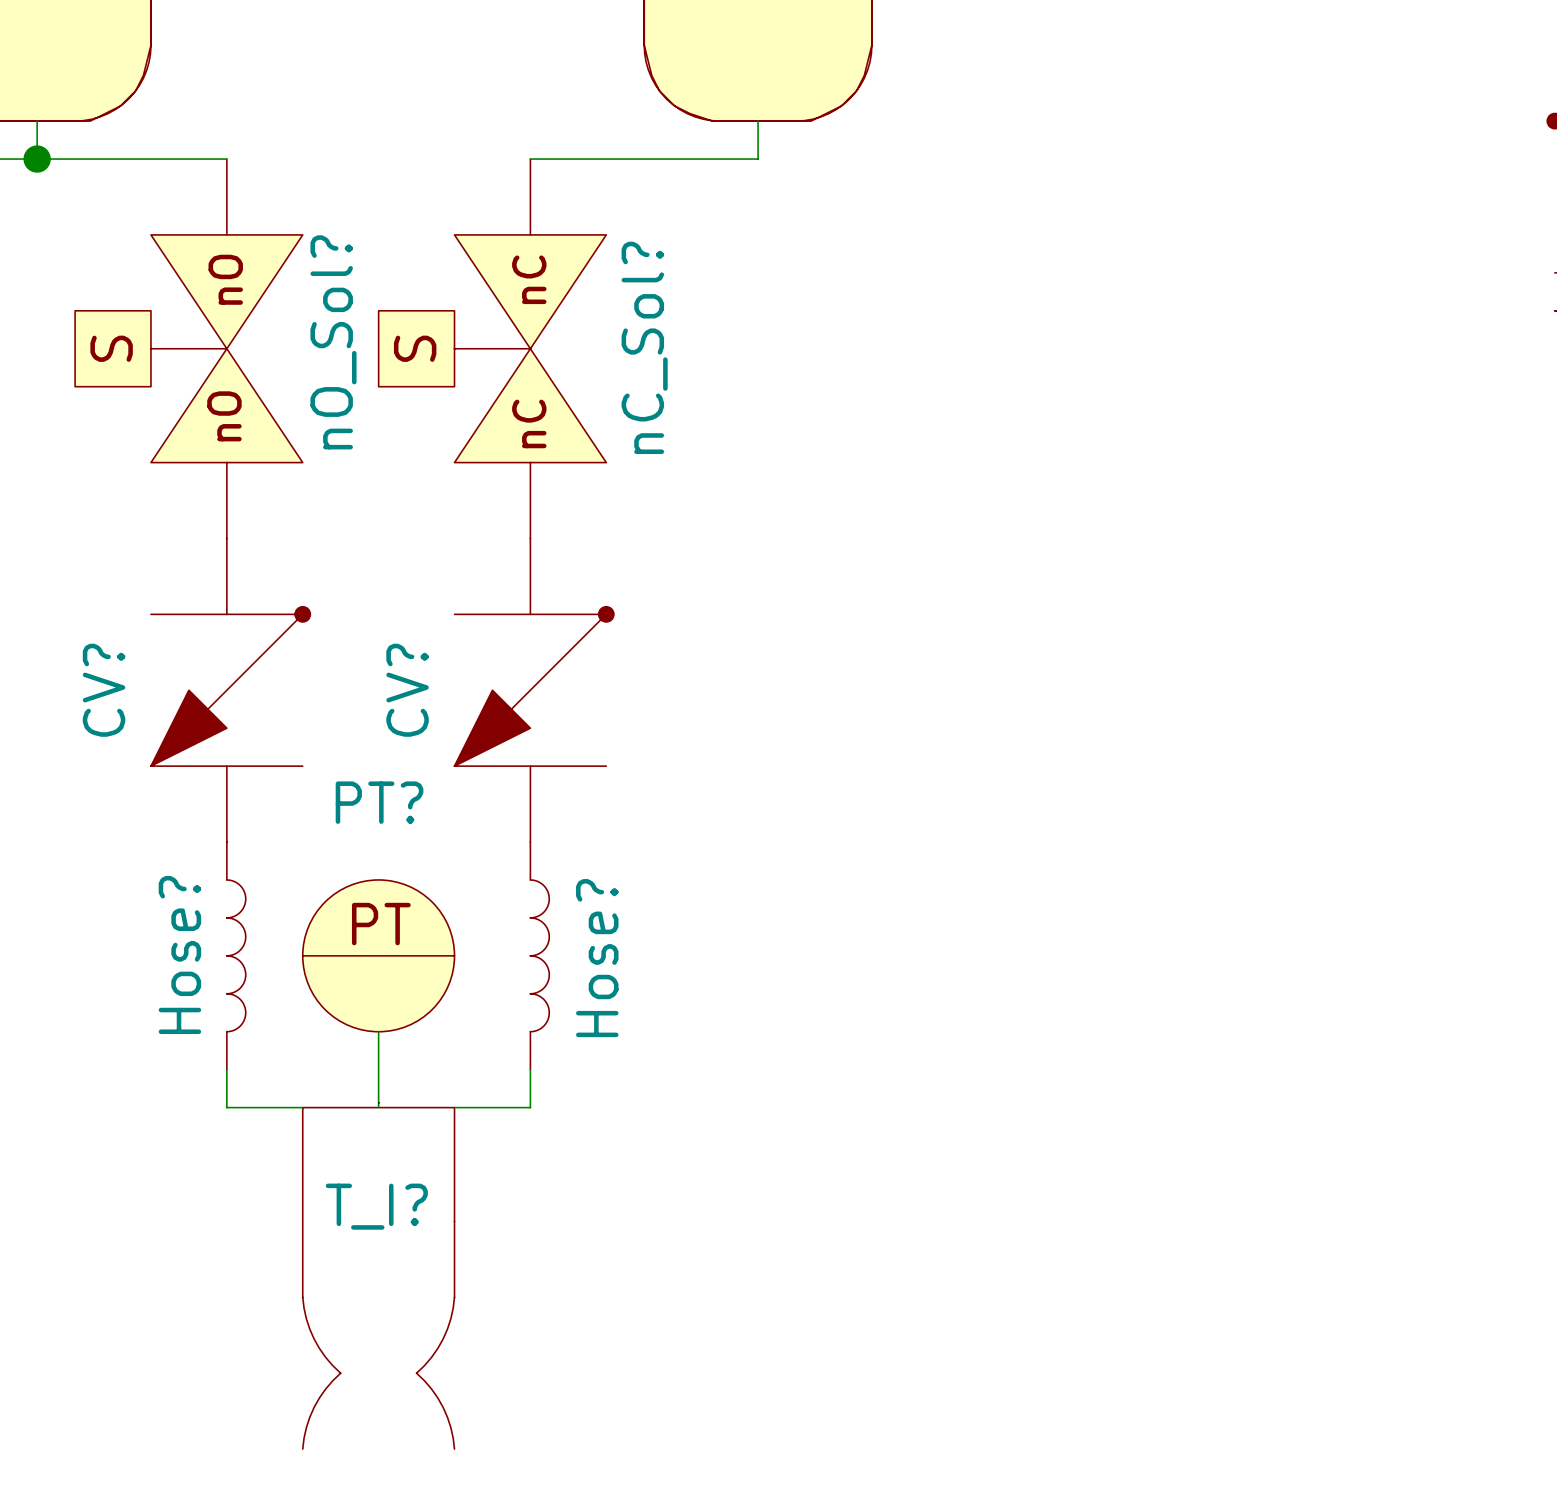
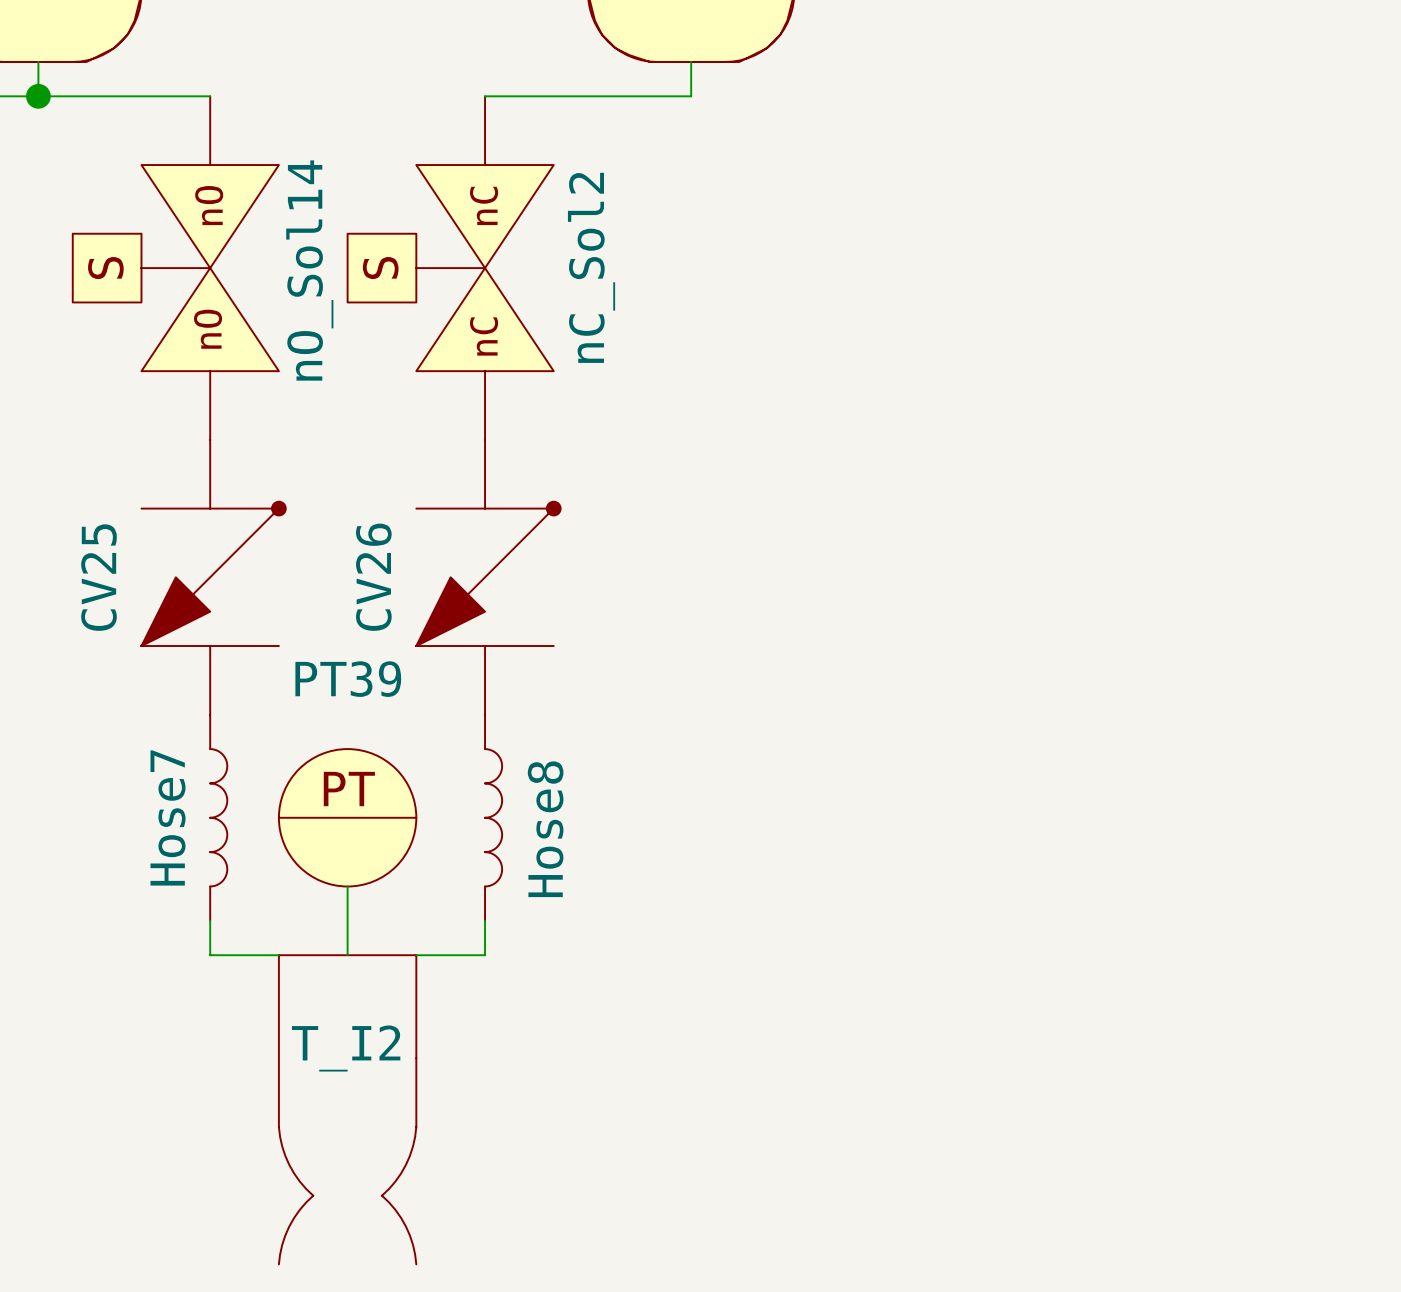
nO_Sol? name: nO_Sol? (333, 342) -> nO_Sol14 (309, 270)
nC_Sol? name: nC_Sol? (644, 347) -> nC_Sol2 (591, 267)
CV? name: CV? (104, 690) -> CV25 (98, 577)
CV? name: CV? (407, 690) -> CV26 (373, 577)
PT? name: PT? (379, 802) -> PT39 (348, 679)
Hose? name: Hose? (179, 954) -> Hose7 (168, 817)
Hose? name: Hose? (597, 958) -> Hose8 (545, 829)
T_I? name: T_I? (376, 1206) -> T_I2 (346, 1048)

